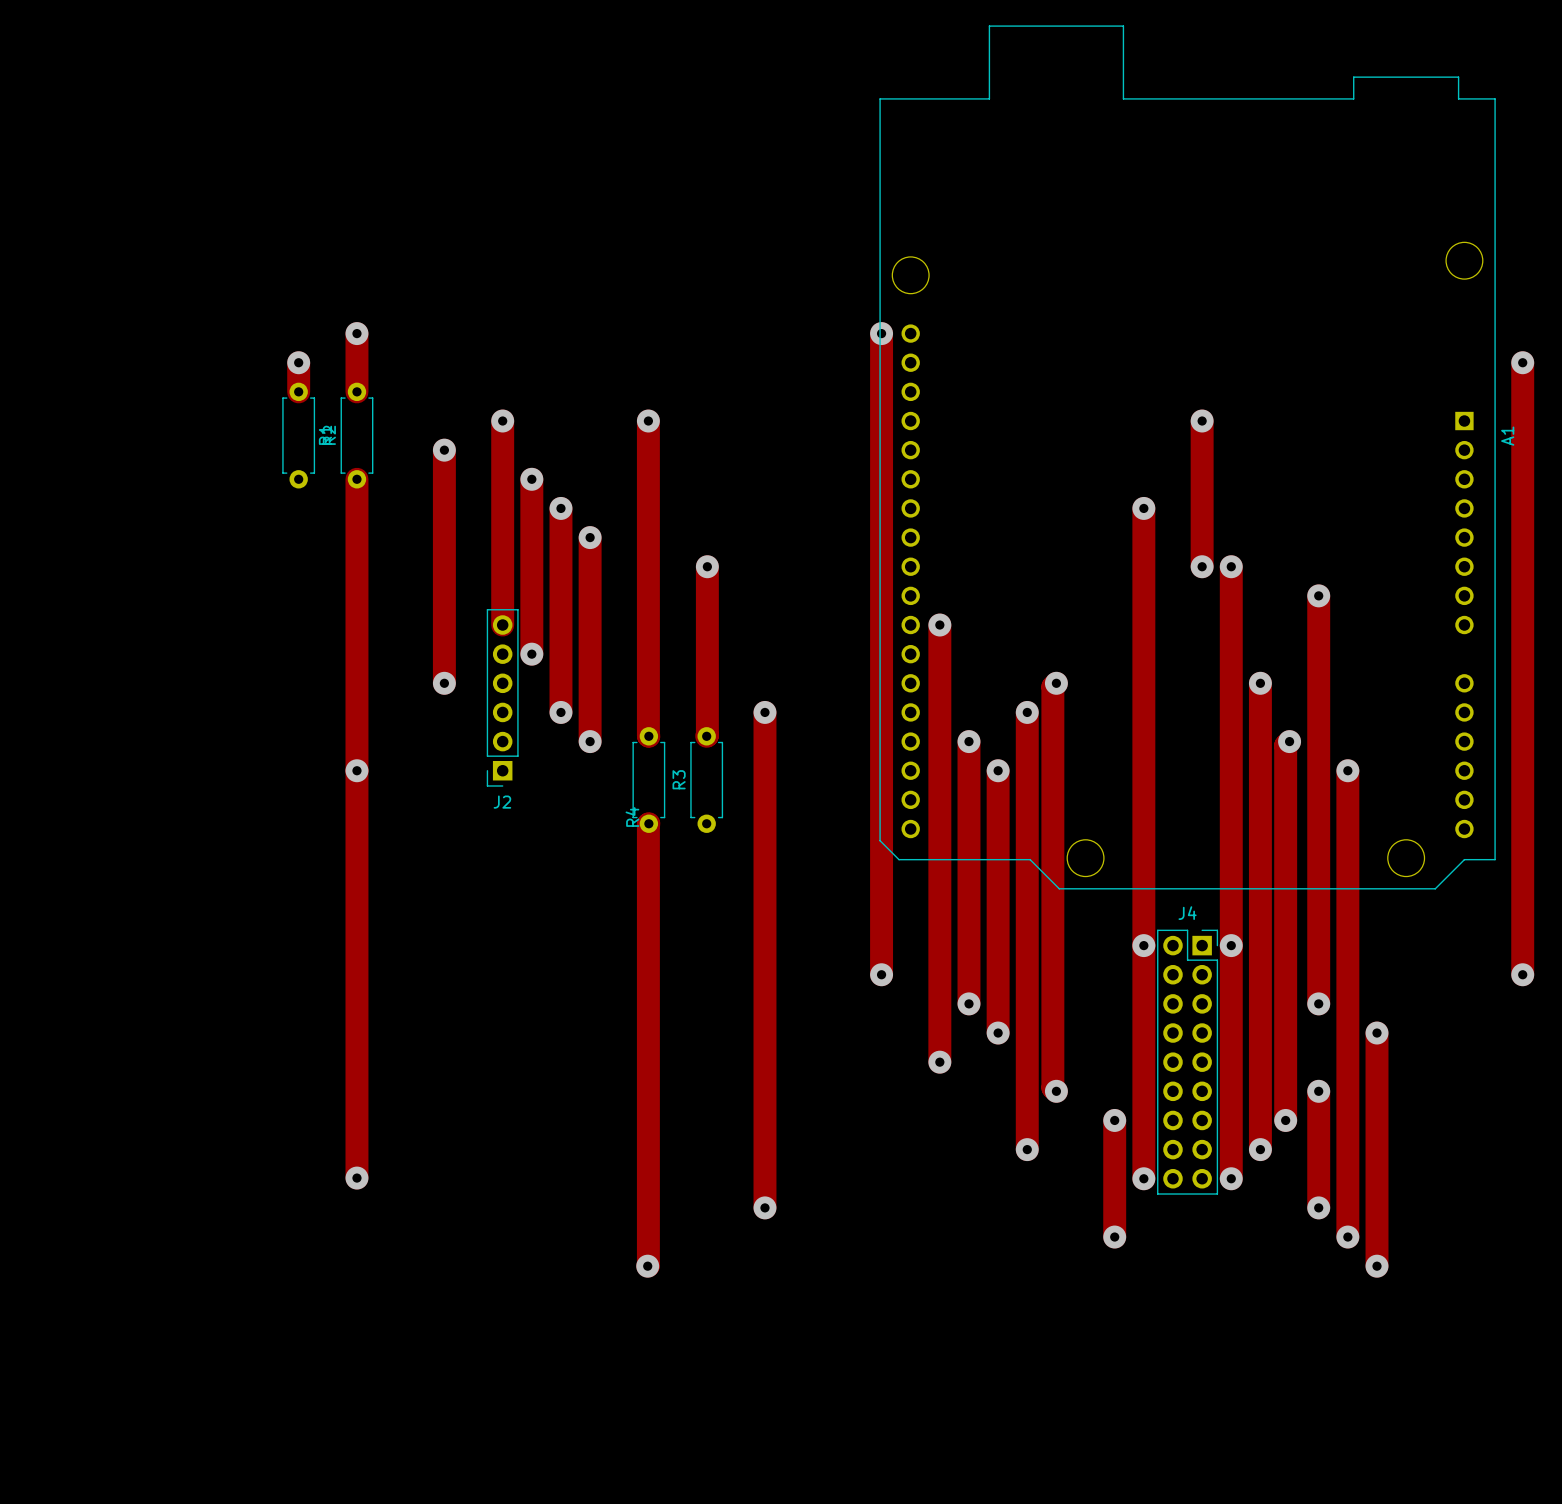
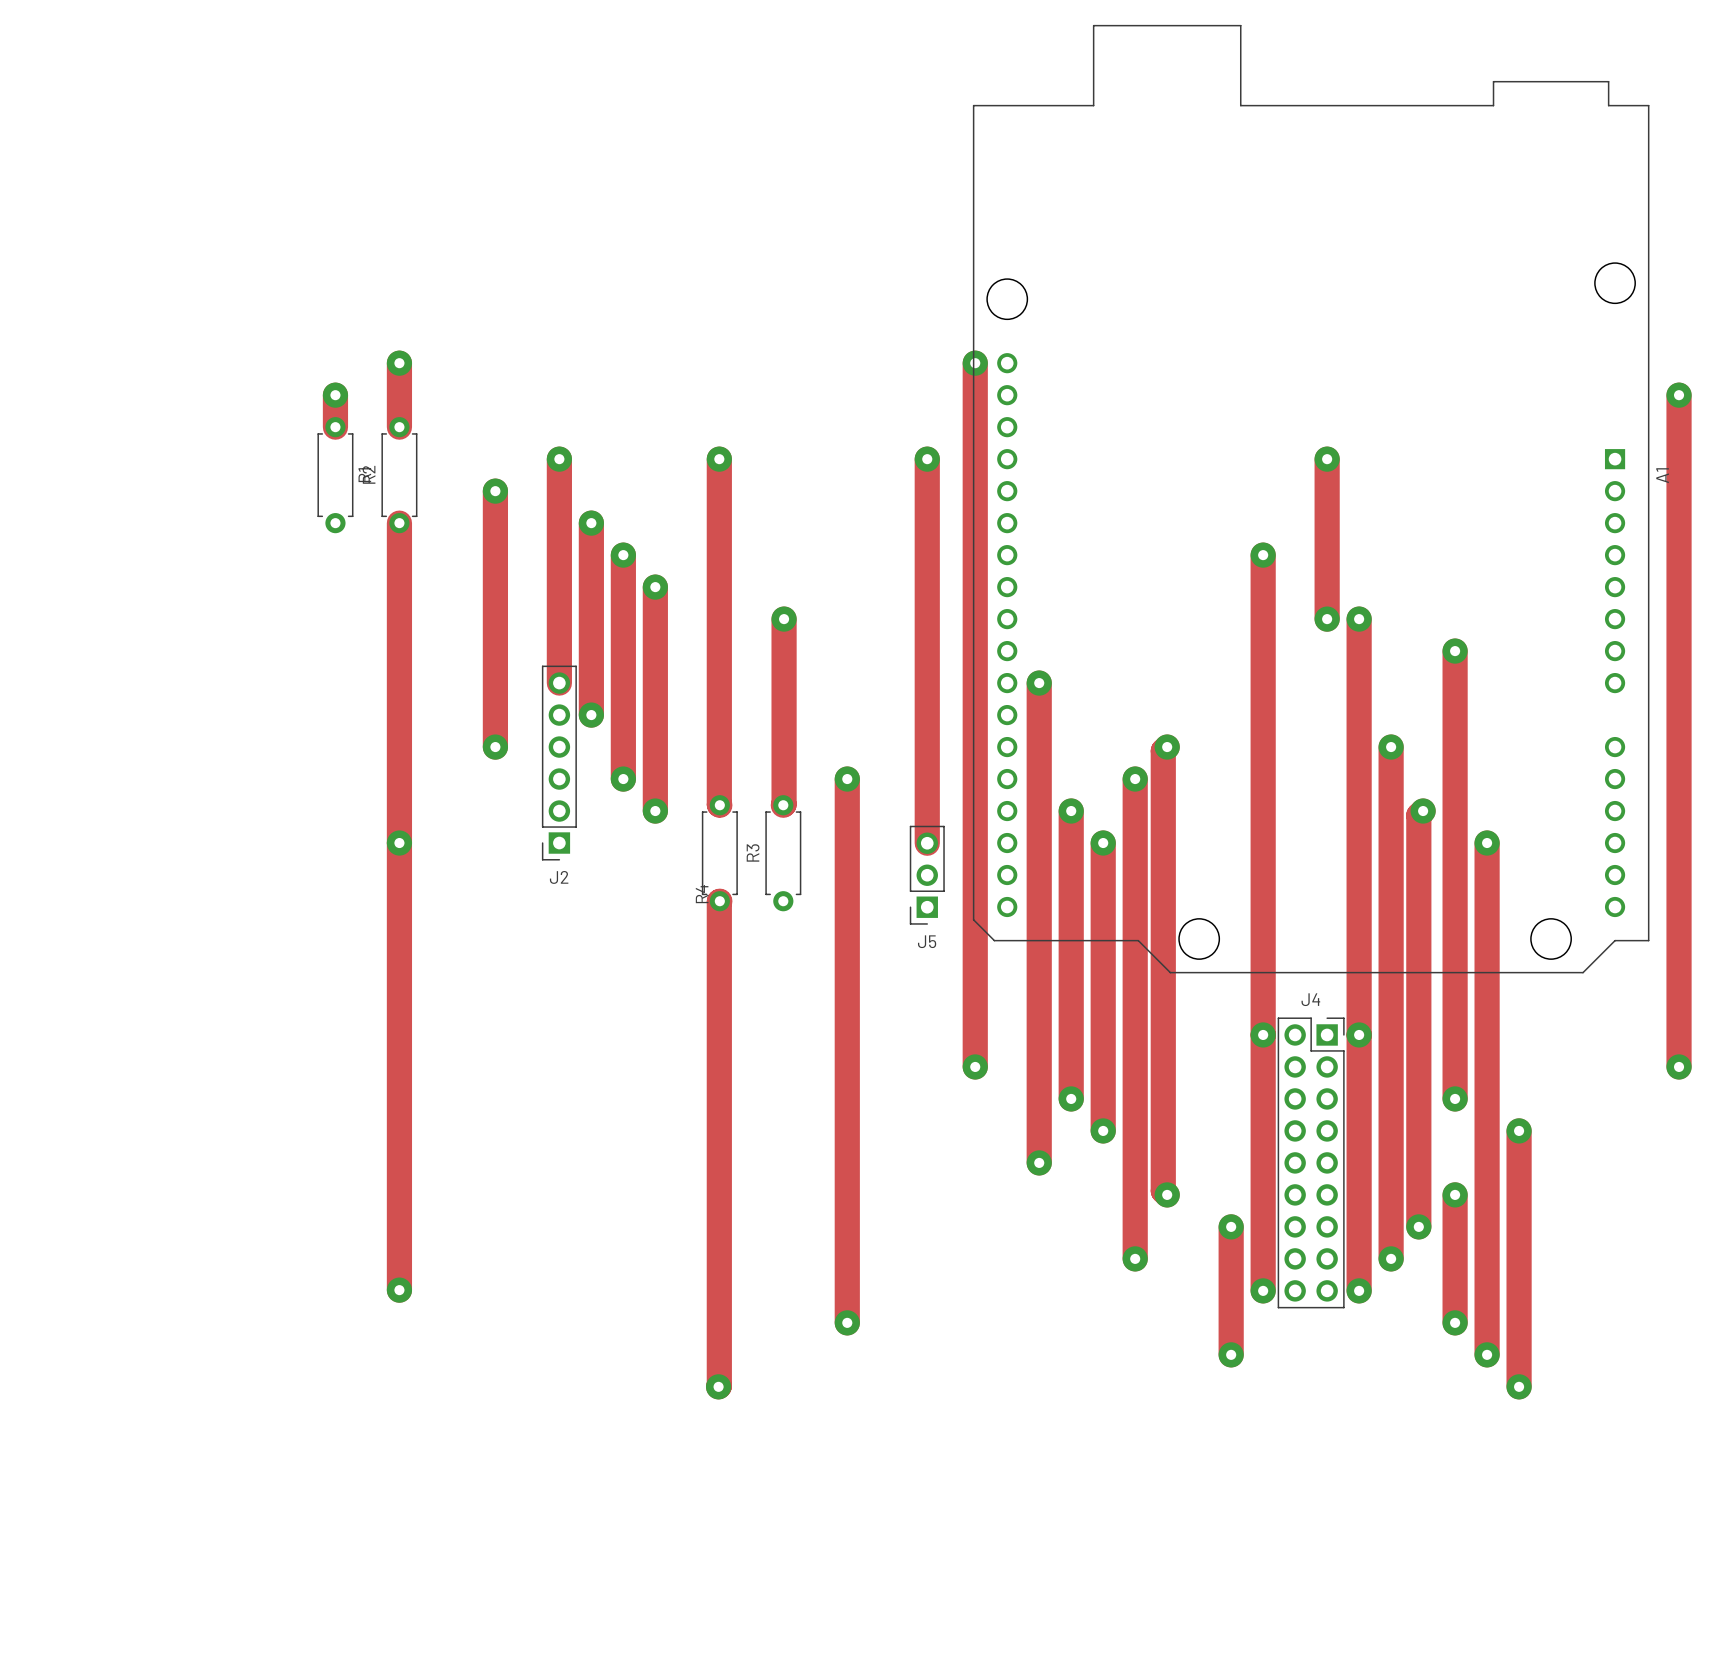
track: none -> (927, 459) (927, 843)
via: none -> (927, 459)
J5: none -> (927, 875)

